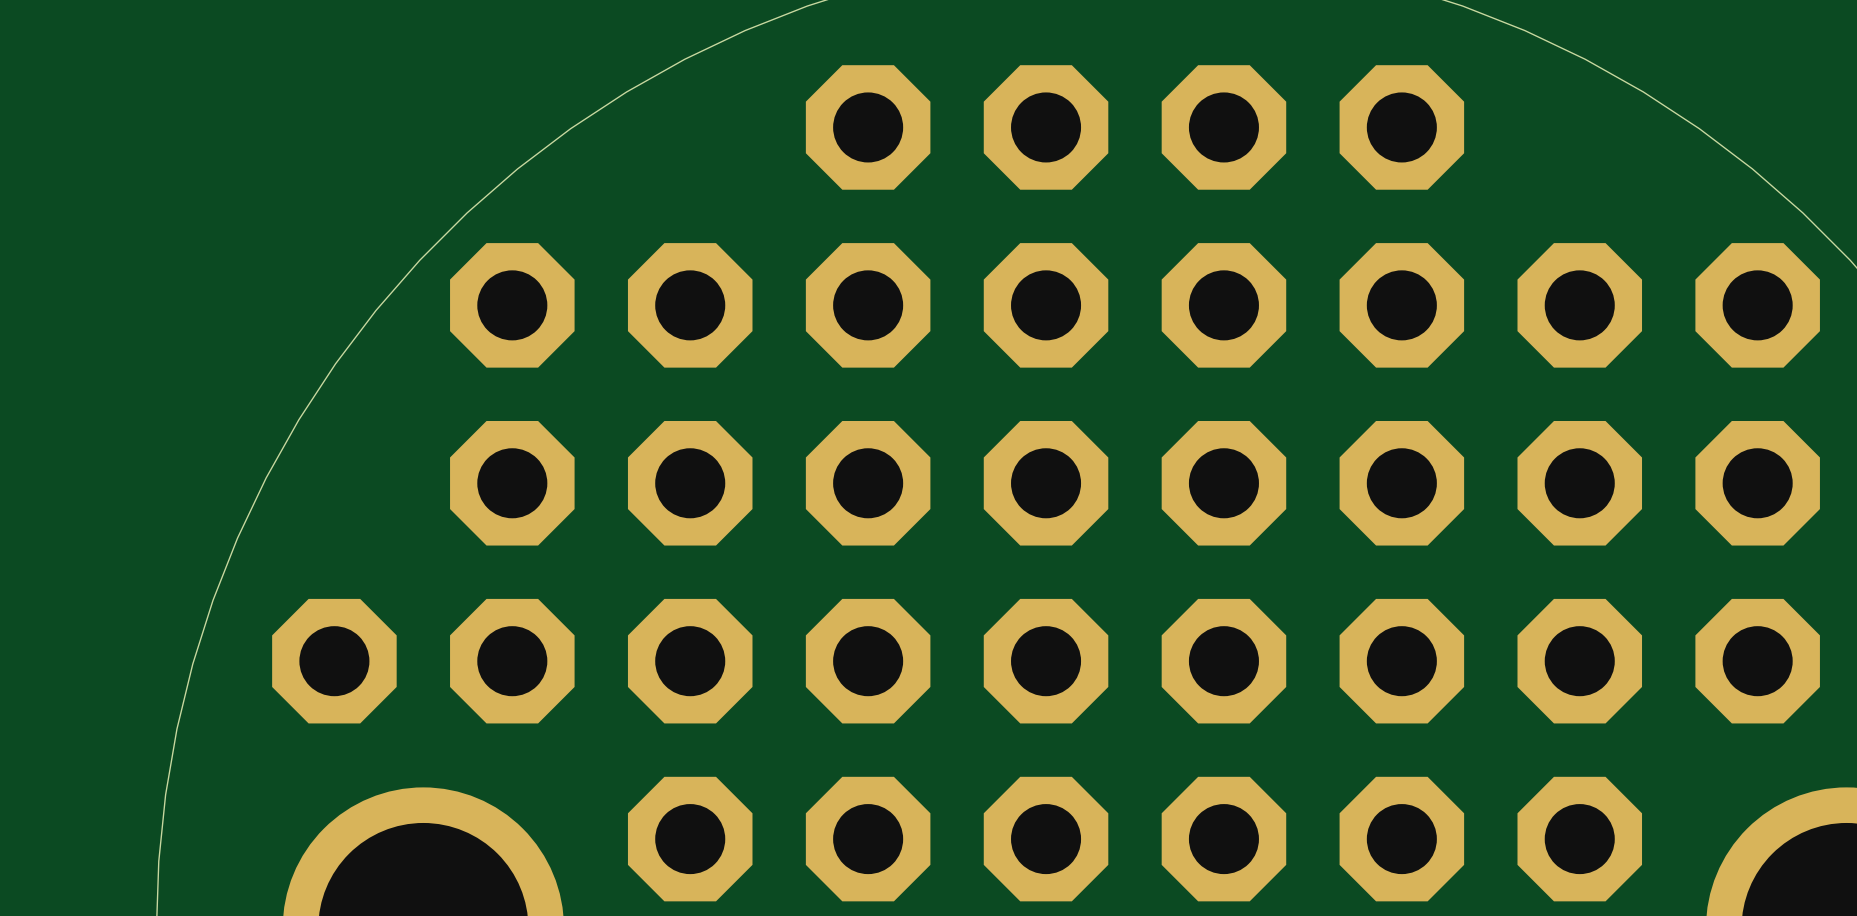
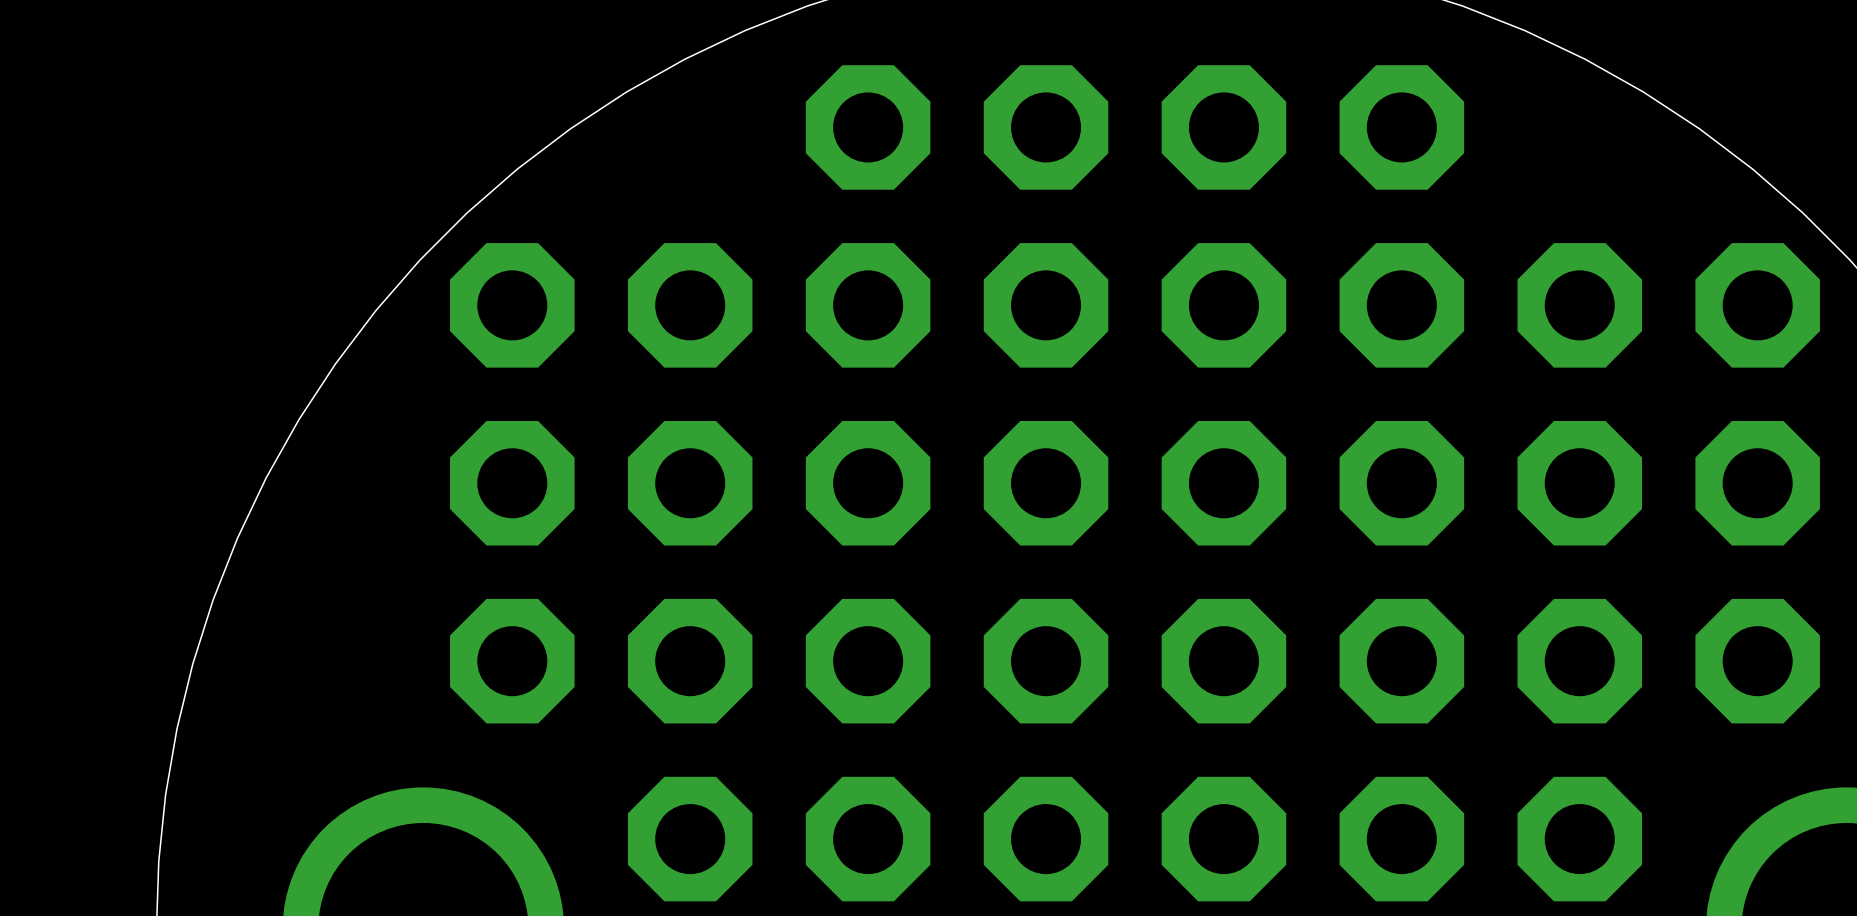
part: (334, 661) -> none

